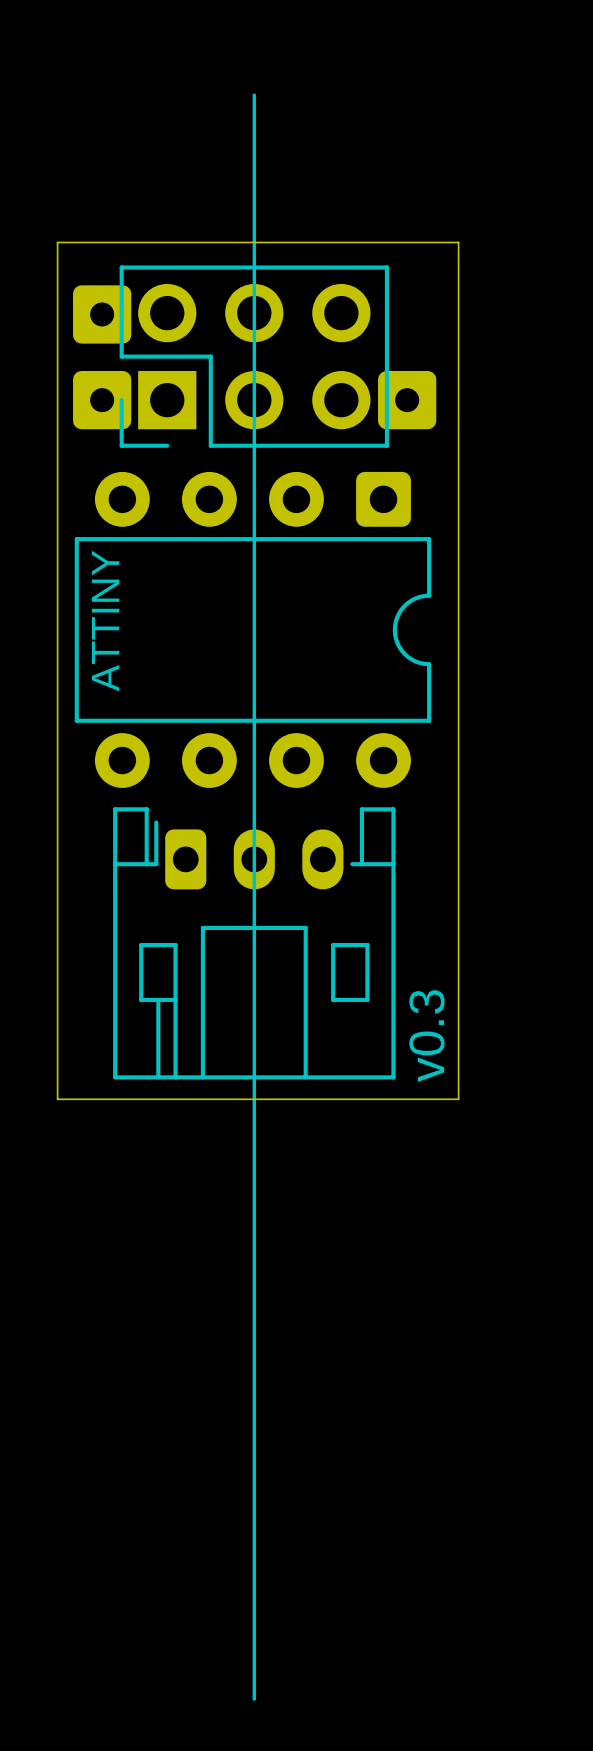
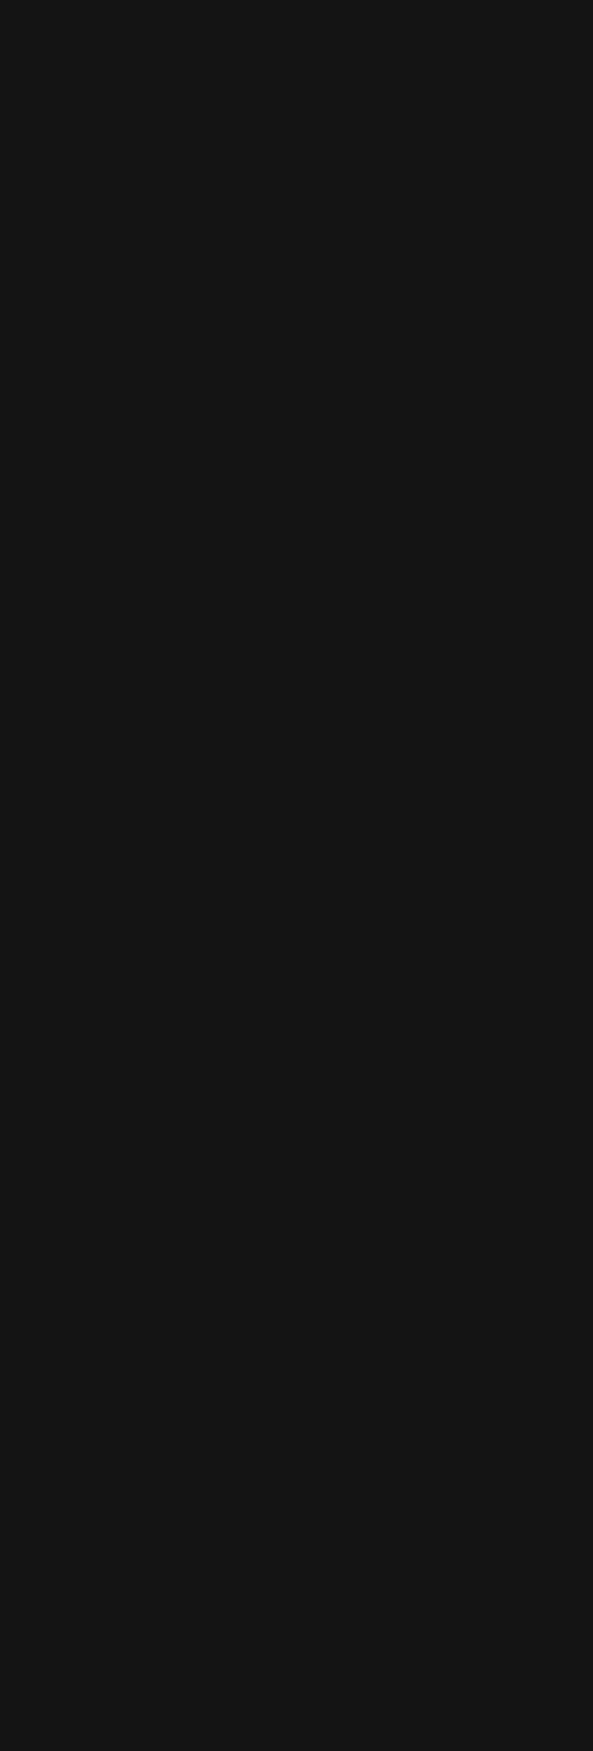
line: (254, 95) (254, 1699) -> none
board edge: (57, 242) (458, 242) (458, 1099) (57, 1099) (57, 242) -> none
part: (102, 314) -> none
part: (254, 356) -> none
part: (102, 400) -> none
part: (407, 400) -> none
text: ATTINY (105, 620) -> none
part: (252, 629) -> none
part: (254, 943) -> none
text: v0.3 (426, 1036) -> none

